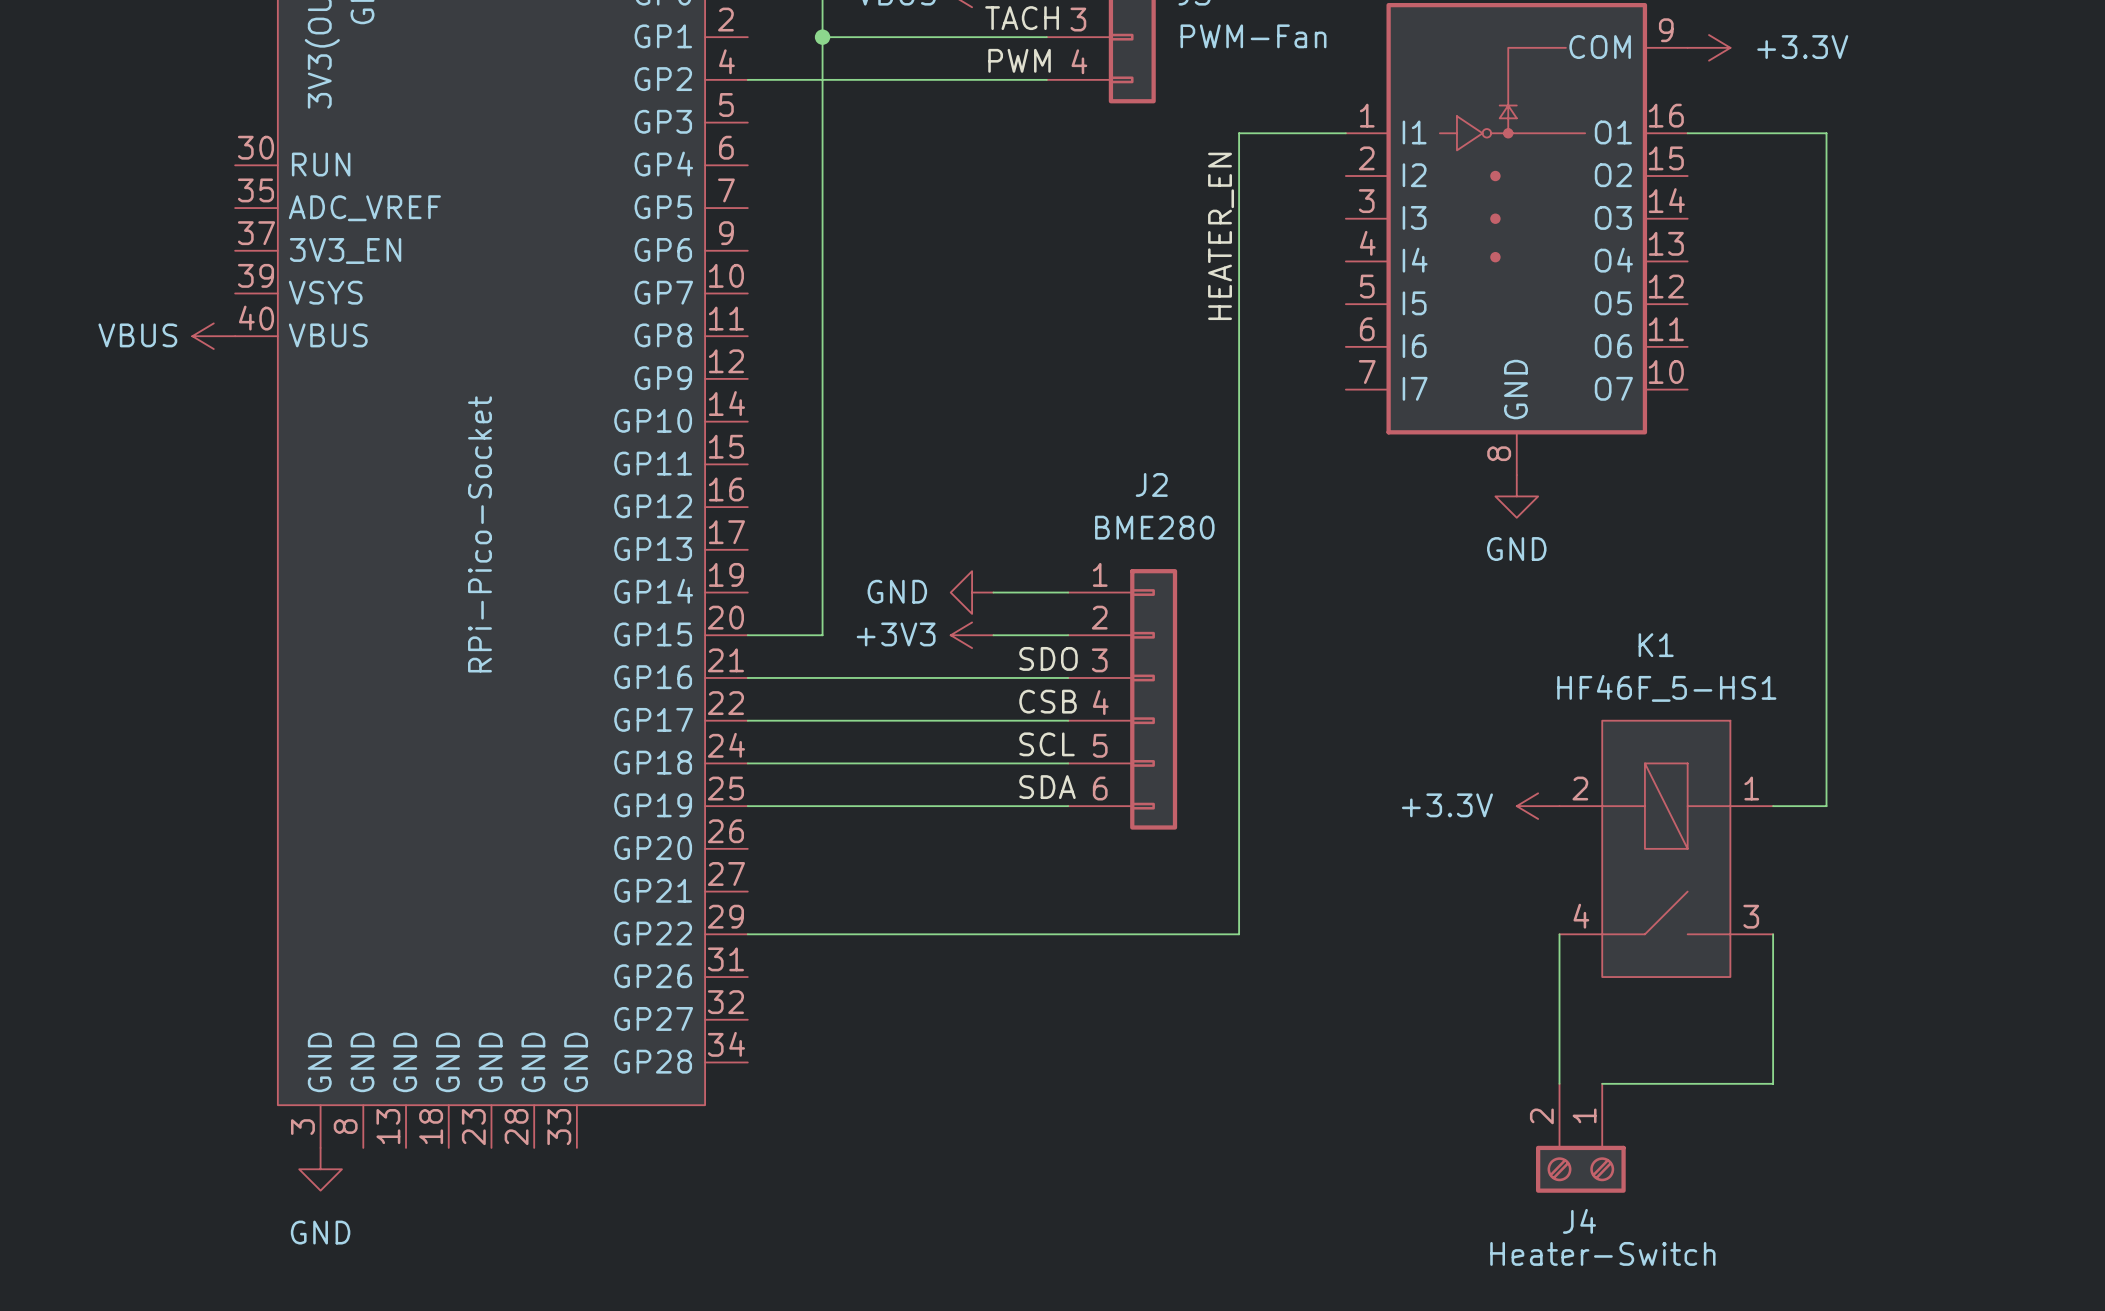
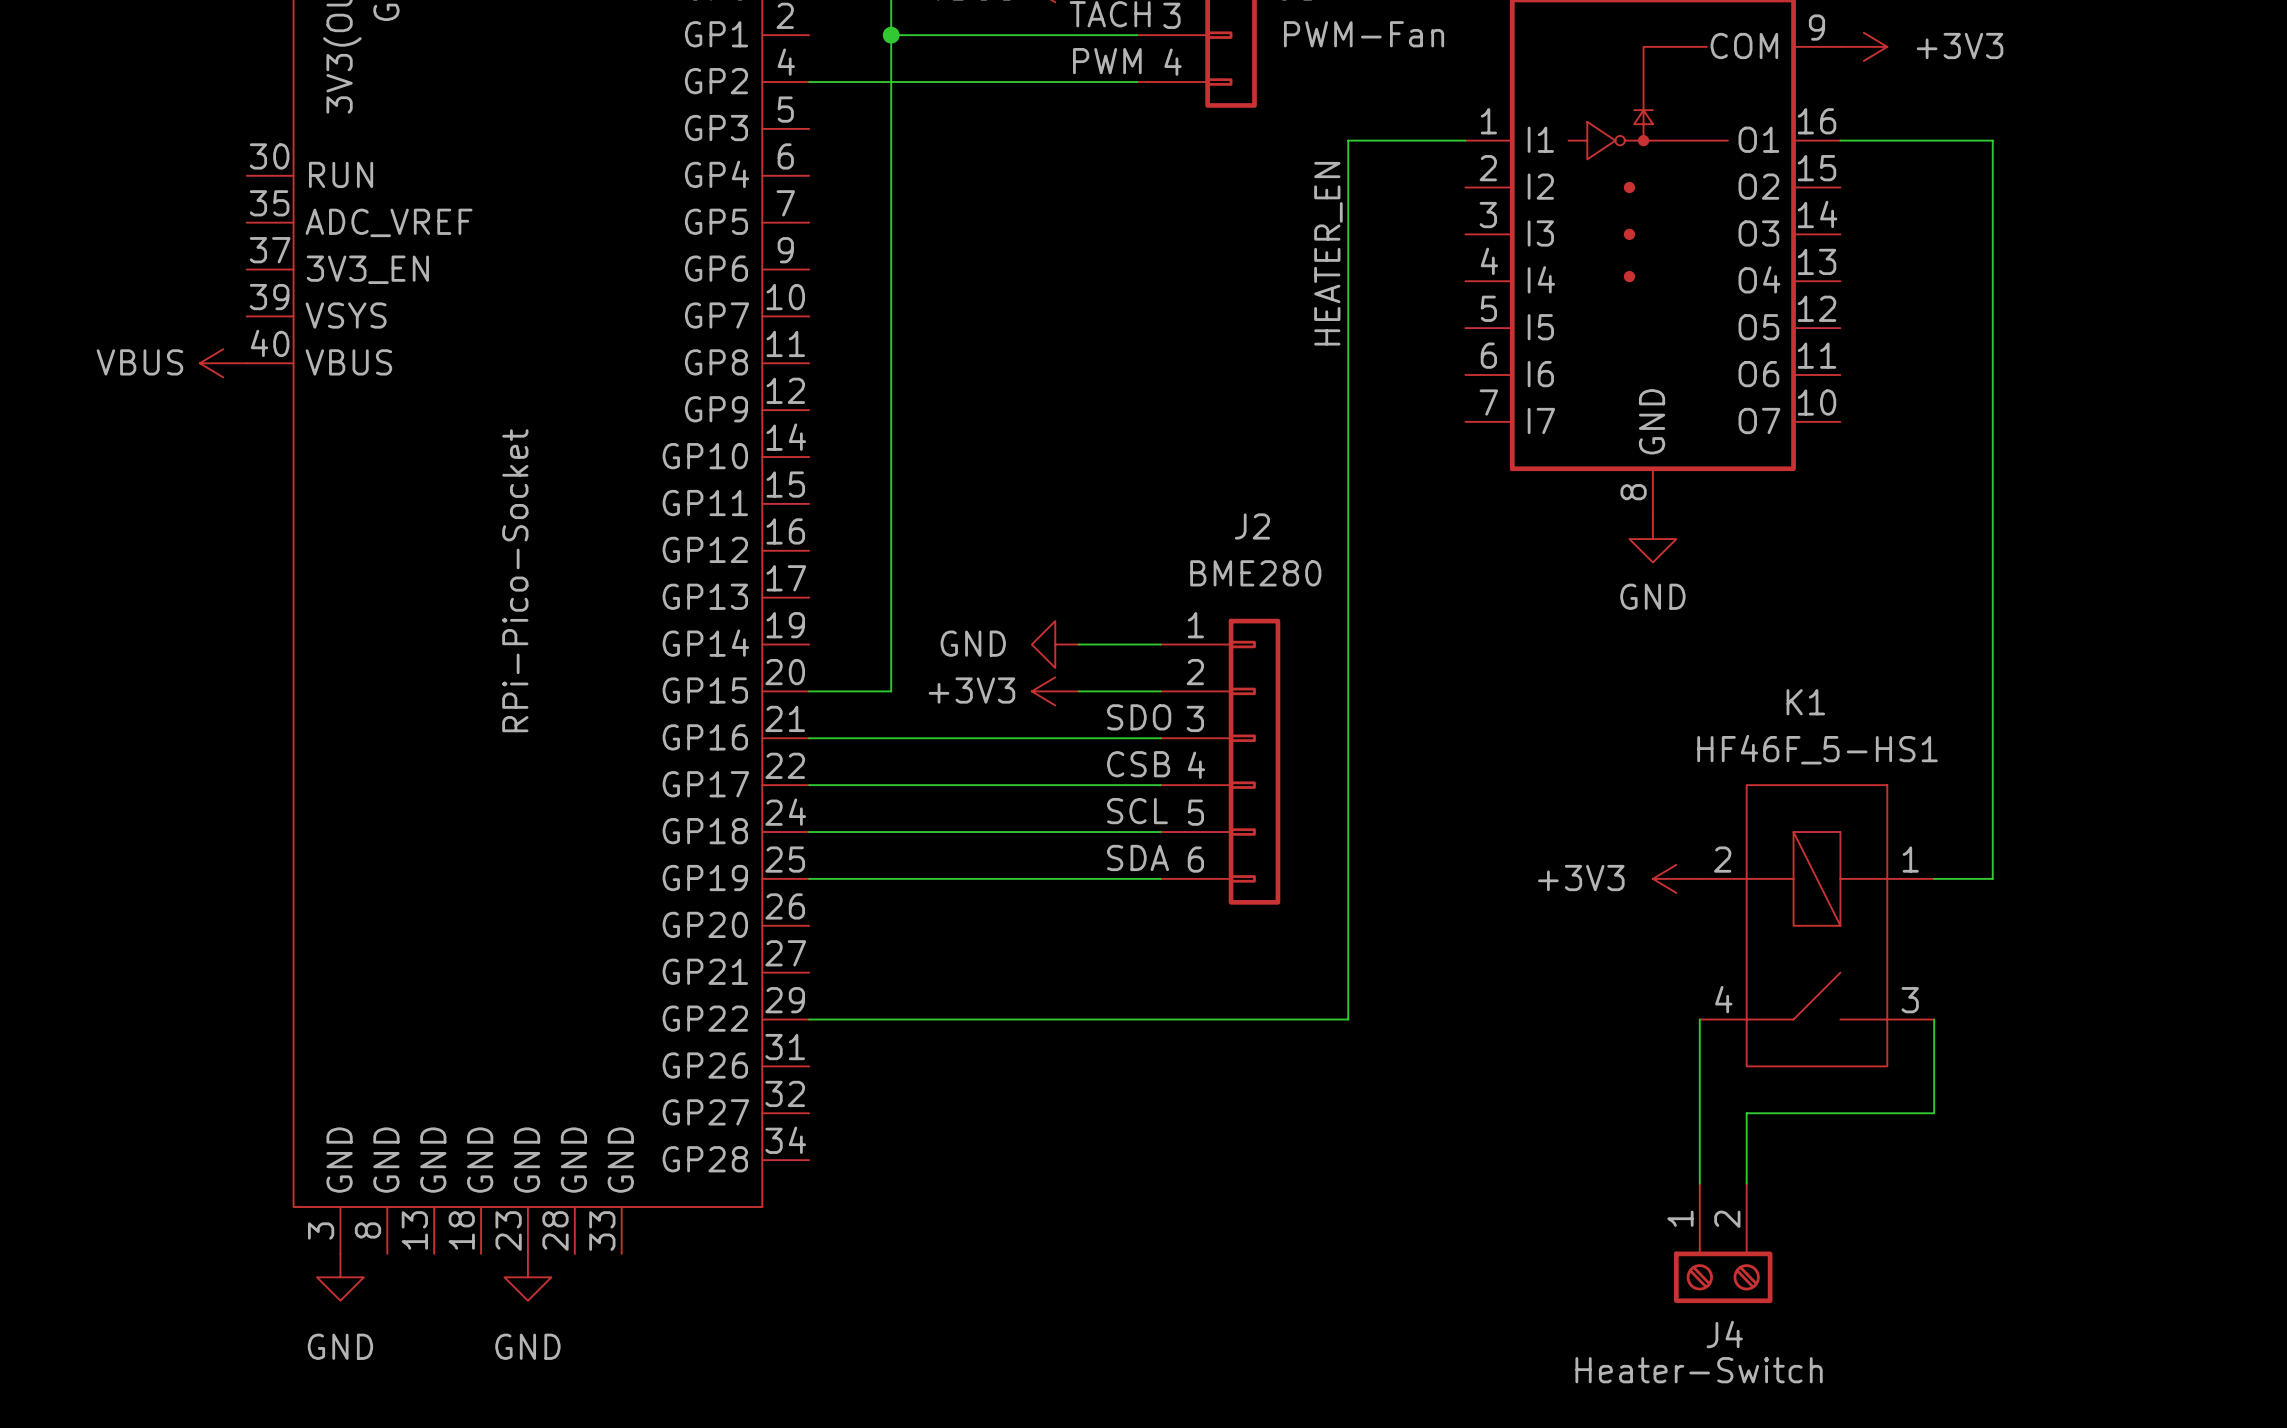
power symbol: +3.3V (1709, 47) -> +3V3 (1863, 46)
power symbol: +3.3V (1538, 806) -> +3V3 (1676, 878)
wire: (1773, 1019) (1773, 1083) (1602, 1083) -> (1934, 1113) (1746, 1113) (1746, 1183)
power symbol: none -> GND (527, 1277)
J4 flip: as is (1580, 1169) -> left-right (1723, 1277)

